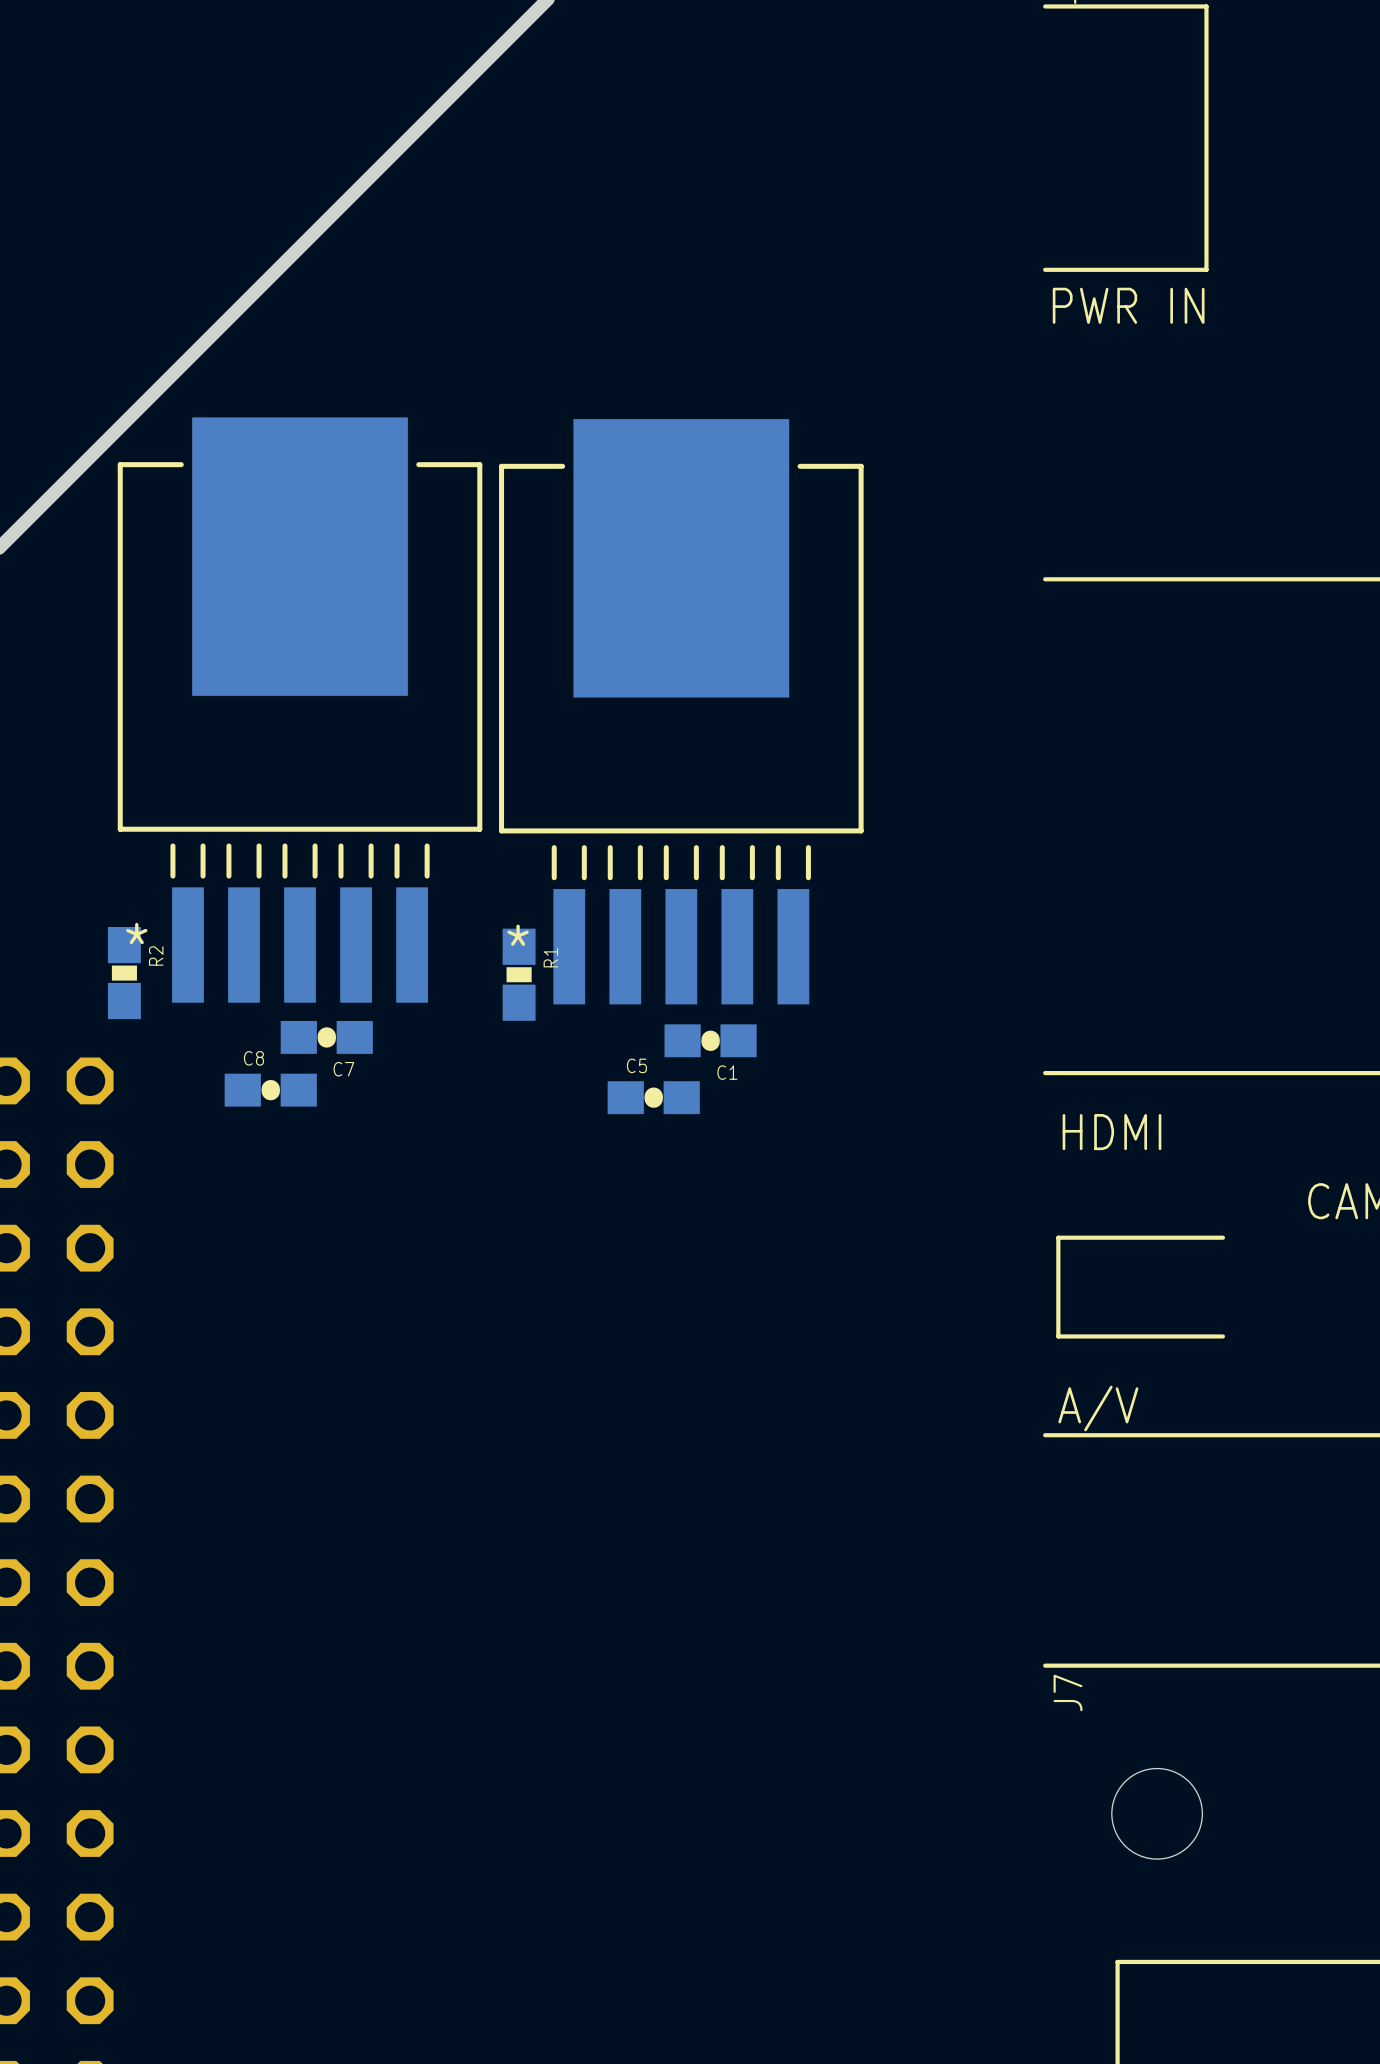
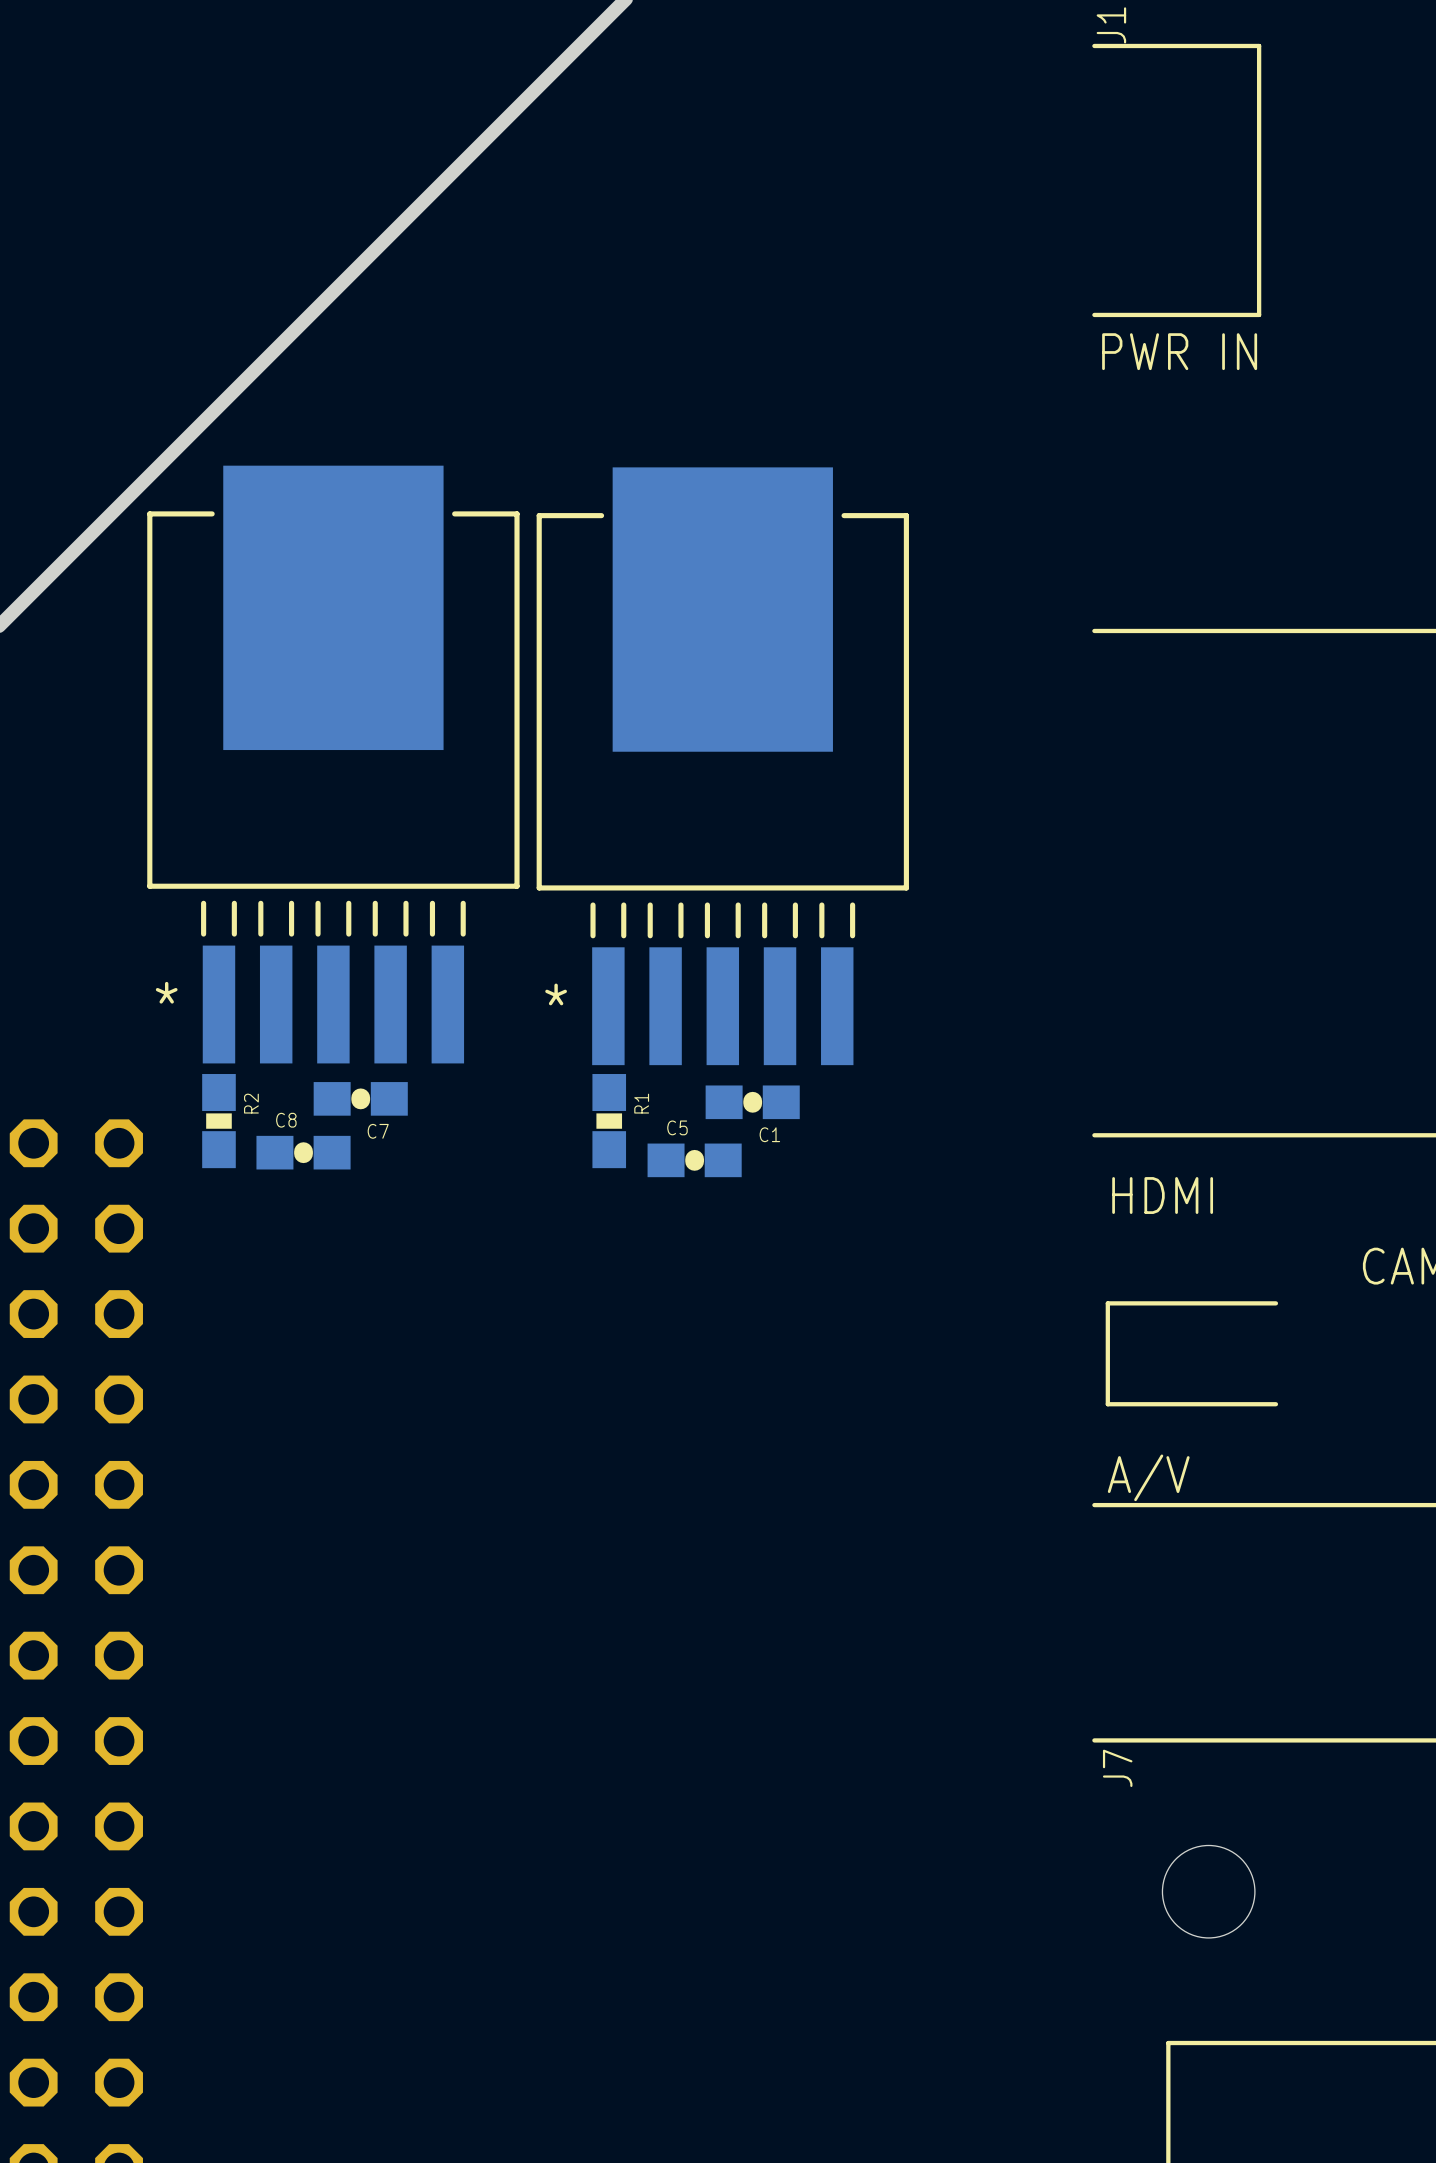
R2 position: (124, 973) -> (218, 1121)
R1 position: (519, 974) -> (609, 1121)

